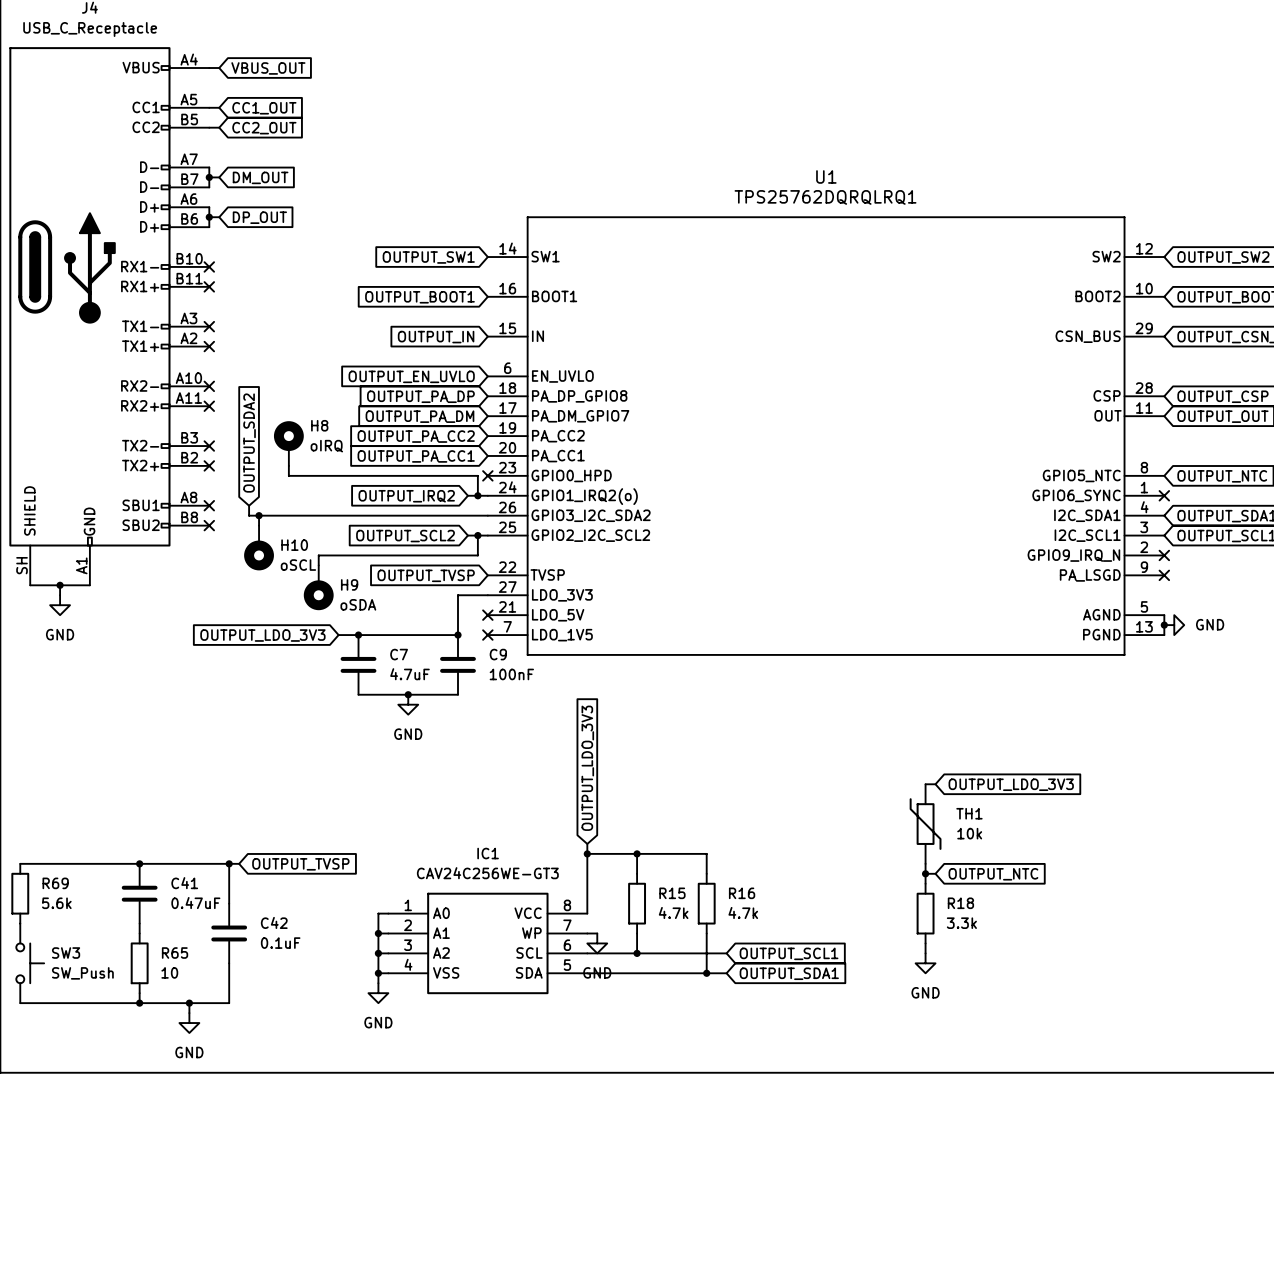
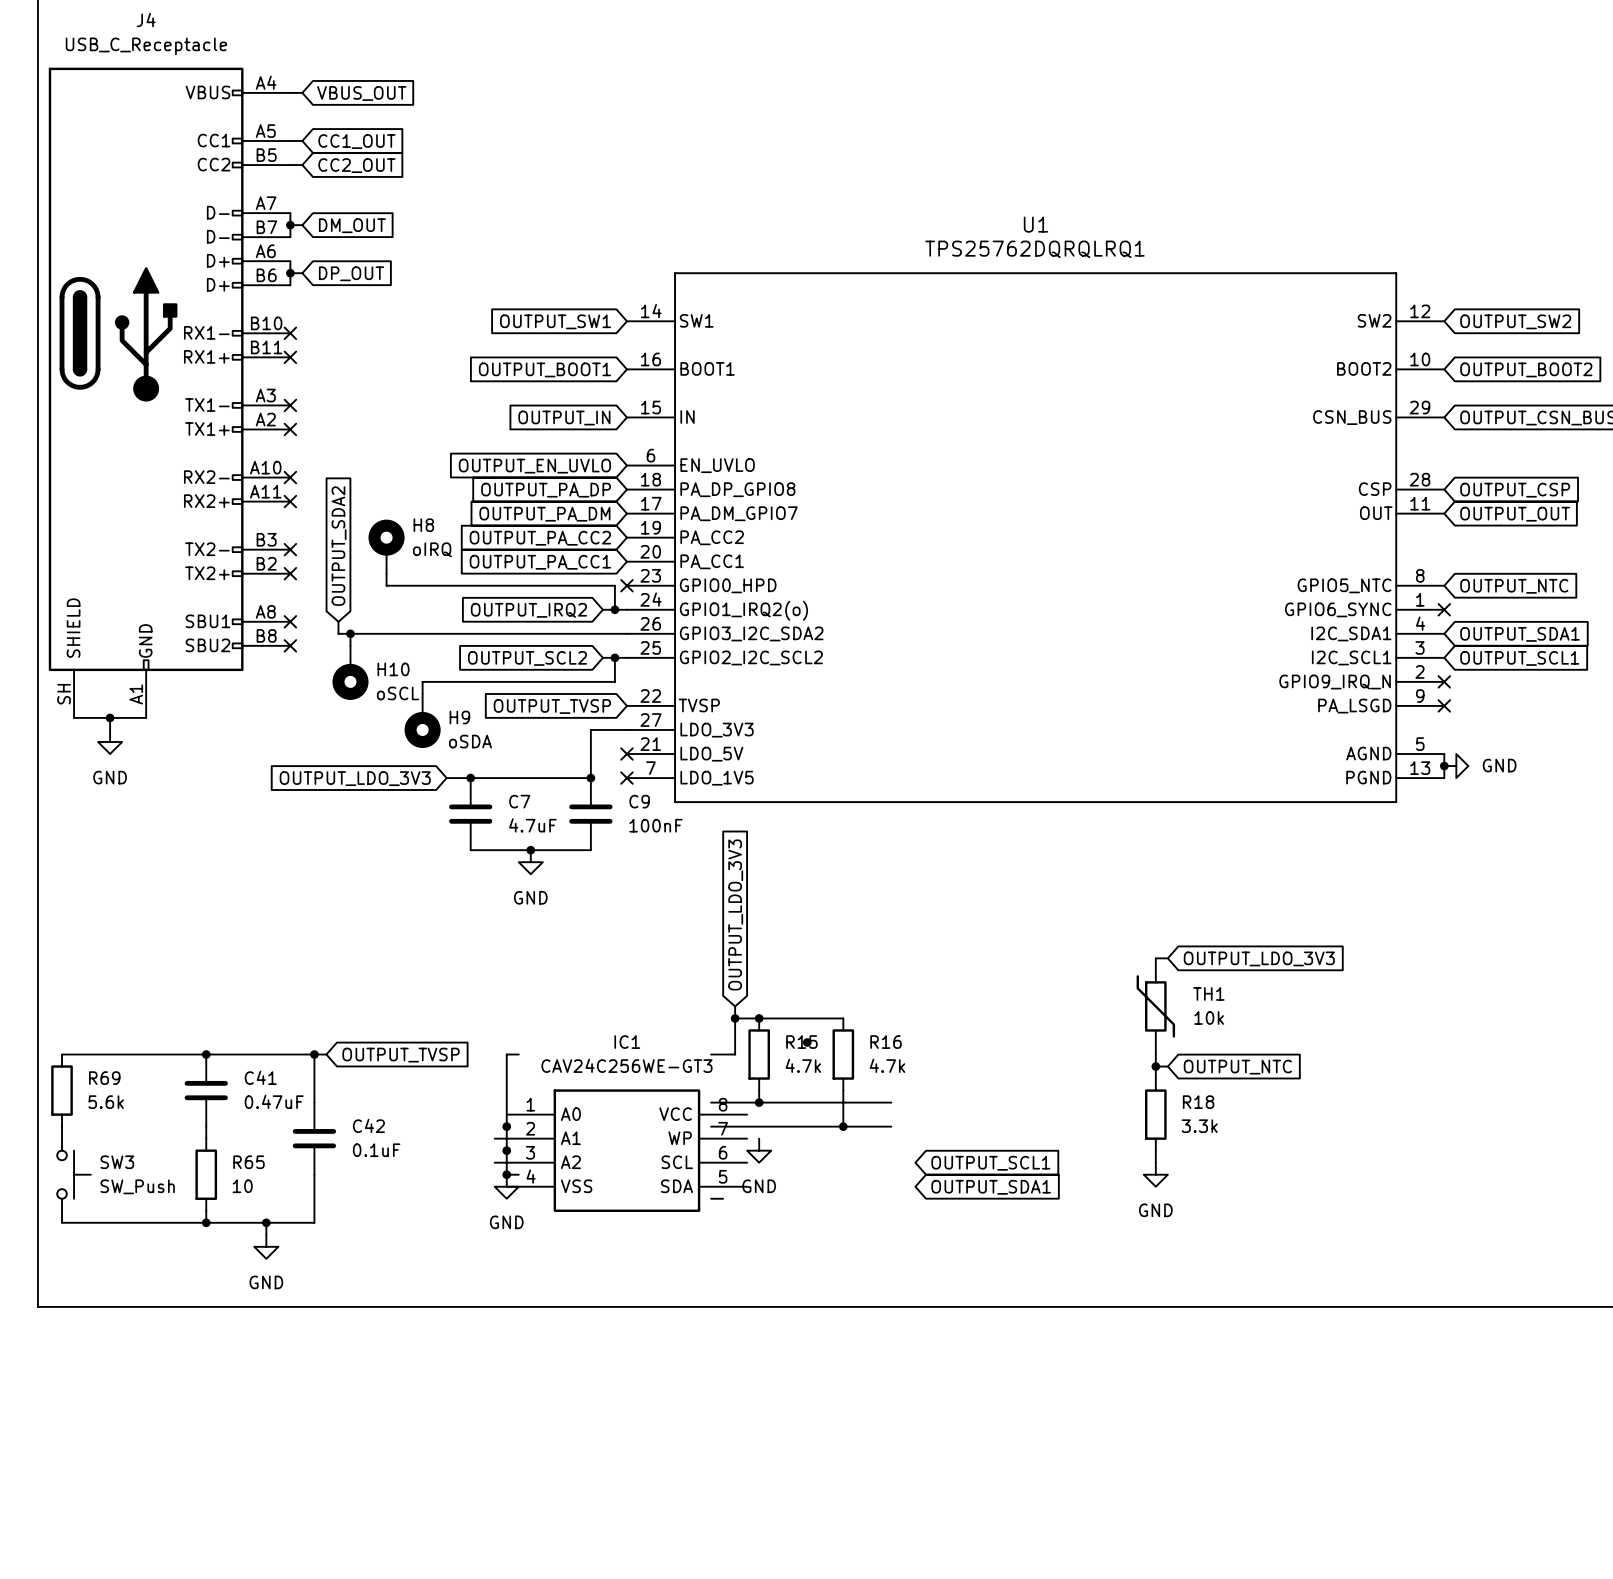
global label position: OUTPUT_LDO_3V3 (587, 768) -> OUTPUT_LDO_3V3 (735, 914)
wire: none -> (735, 1006) (735, 1054) (711, 1054)
wire: none -> (735, 1018) (843, 1018)
junction: none -> (735, 1018)
junction: none -> (759, 1018)
wire: (587, 843) (587, 913) -> none
wire: (587, 853) (706, 853) (706, 873) -> none
junction: (587, 853) -> none
wire: (637, 853) (637, 873) -> none
wire: none -> (518, 1054) (506, 1054) (506, 1174) (518, 1174)
wire: none -> (759, 1090) (759, 1102)
wire: none -> (843, 1090) (843, 1126)
wire: none -> (711, 1102) (891, 1102)
junction: none -> (759, 1102)
R15 position: (637, 903) -> (759, 1054)
R16 position: (706, 903) -> (843, 1054)
wire: (388, 913) (378, 913) (378, 983) -> none
junction: none -> (506, 1126)
wire: none -> (711, 1126) (891, 1126)
junction: none -> (843, 1126)
junction: (378, 933) -> none
wire: (587, 933) (597, 933) -> (711, 1198) (723, 1198)
wire: (637, 933) (637, 953) -> none
wire: (706, 933) (706, 973) -> none
junction: none -> (506, 1150)
junction: (378, 953) -> none
wire: (587, 953) (726, 953) -> none
junction: (637, 953) -> none
junction: none -> (506, 1174)
junction: (378, 973) -> none
wire: (587, 973) (726, 973) -> none
junction: (706, 973) -> none
power symbol position: GND (378, 993) -> GND (506, 1186)

